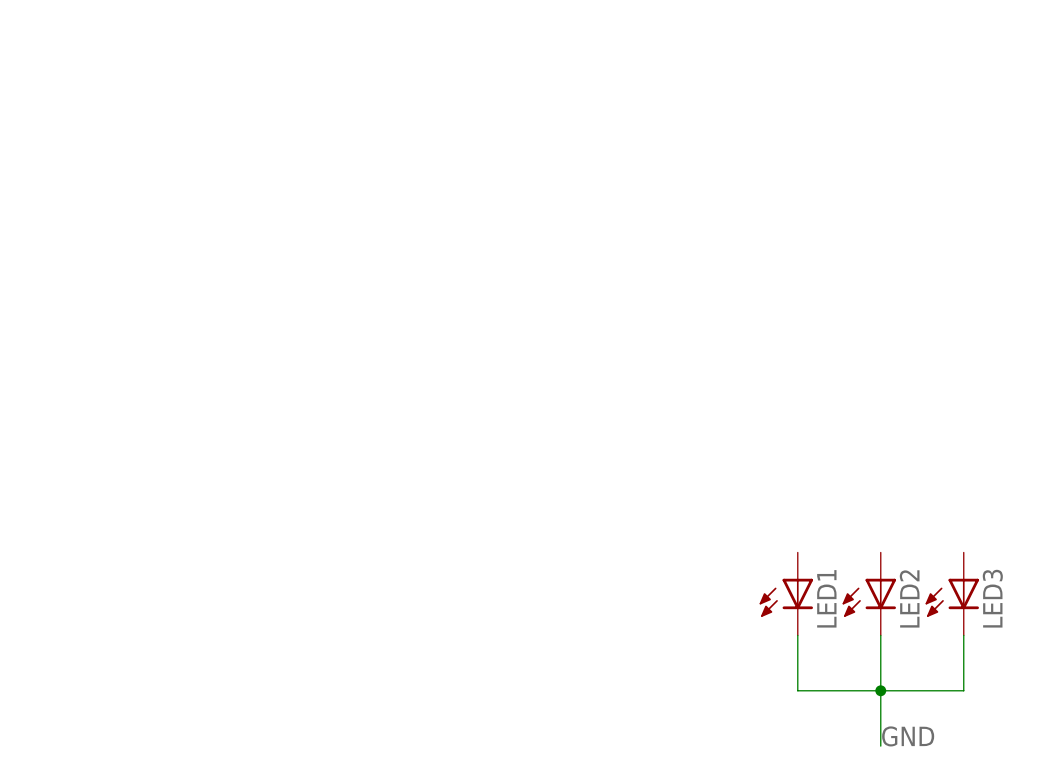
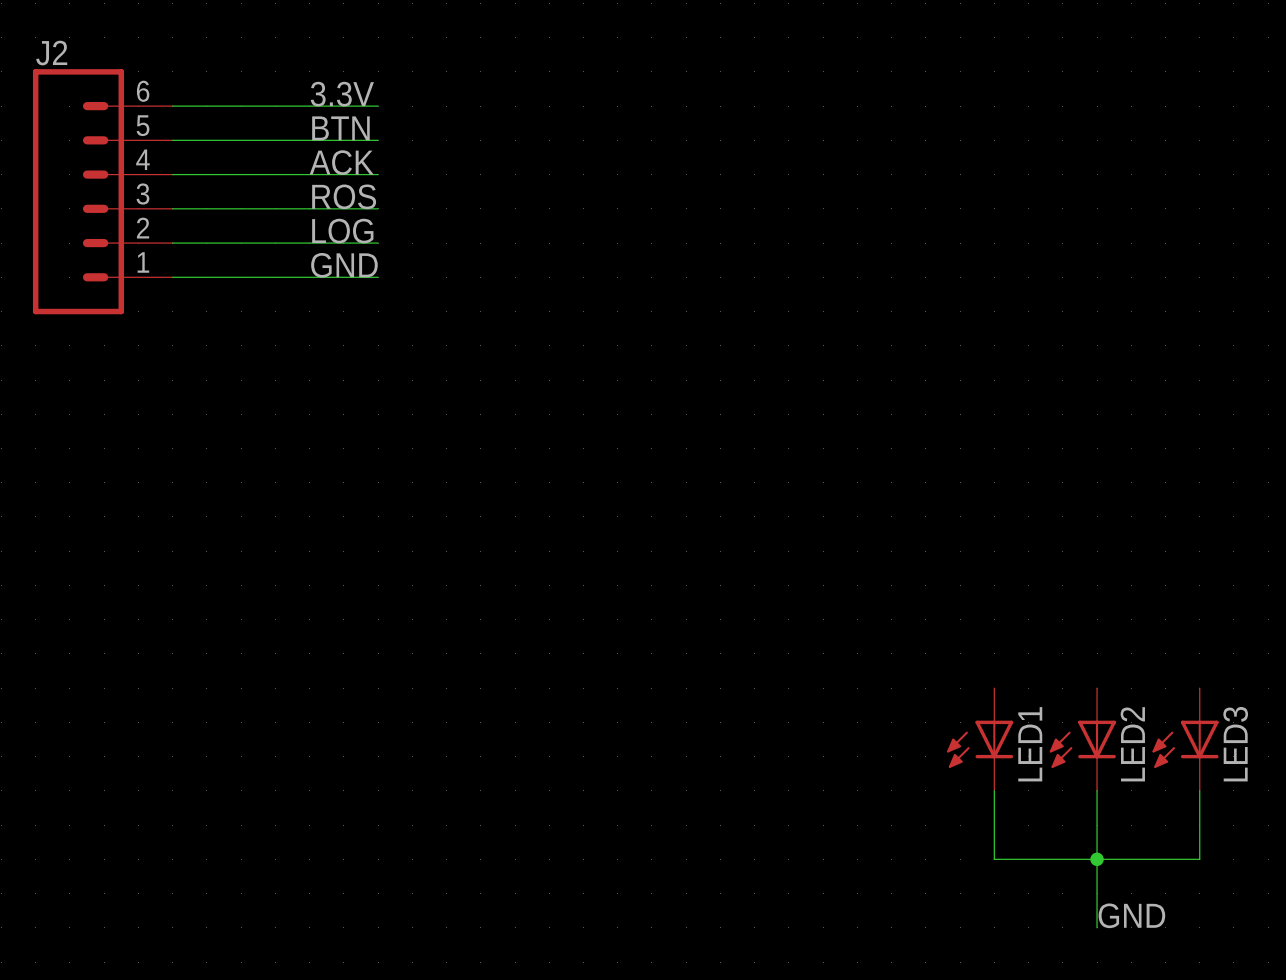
label: none -> 3.3V (342, 94)
wire: none -> (172, 106) (378, 106)
label: none -> BTN (340, 128)
wire: none -> (172, 140) (378, 140)
label: none -> ACK (341, 162)
wire: none -> (172, 174) (378, 174)
J2: none -> (102, 191)
label: none -> ROS (344, 196)
wire: none -> (172, 208) (378, 208)
label: none -> LOG (342, 231)
wire: none -> (172, 243) (378, 243)
label: none -> GND (344, 265)
wire: none -> (172, 277) (378, 277)

